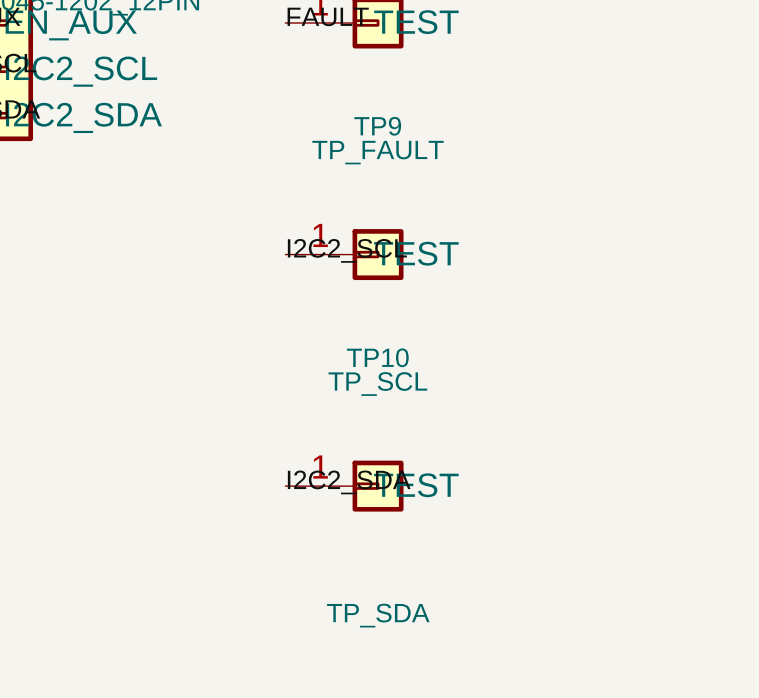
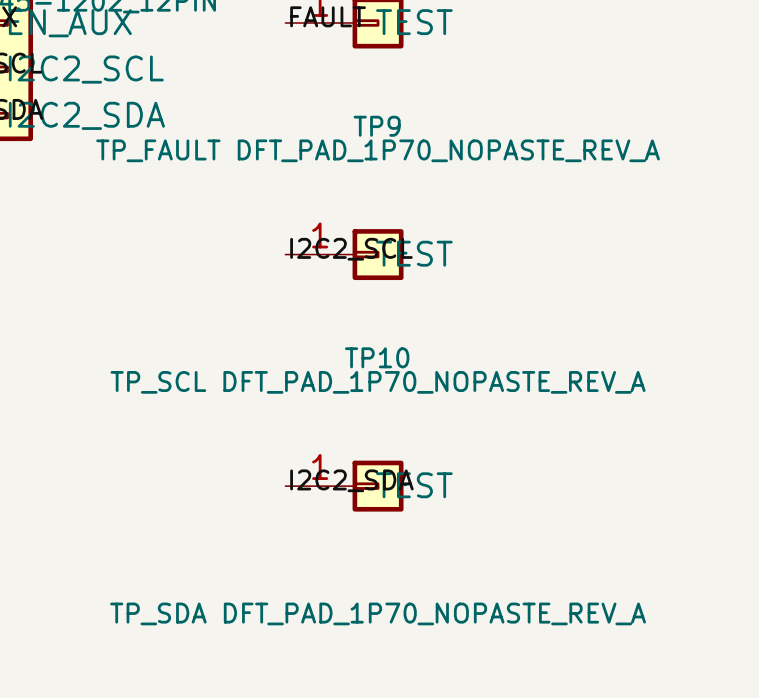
part value: TP_FAULT (378, 152) -> TP_FAULT DFT_PAD_1P70_NOPASTE_REV_A (378, 150)
TP9 value: TP_SCL (377, 384) -> TP_SCL DFT_PAD_1P70_NOPASTE_REV_A (378, 382)
TP10 value: TP_SDA (378, 615) -> TP_SDA DFT_PAD_1P70_NOPASTE_REV_A (378, 613)

